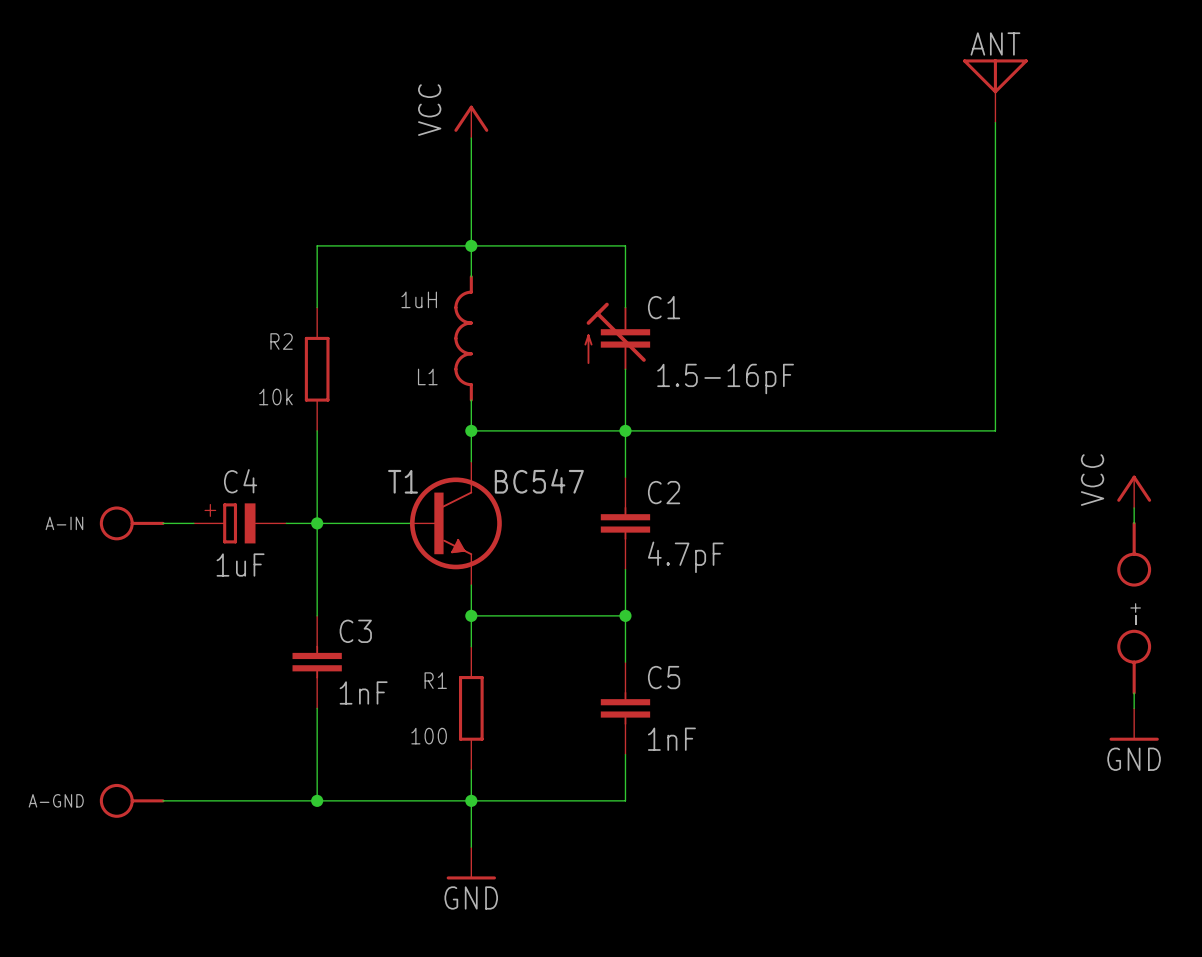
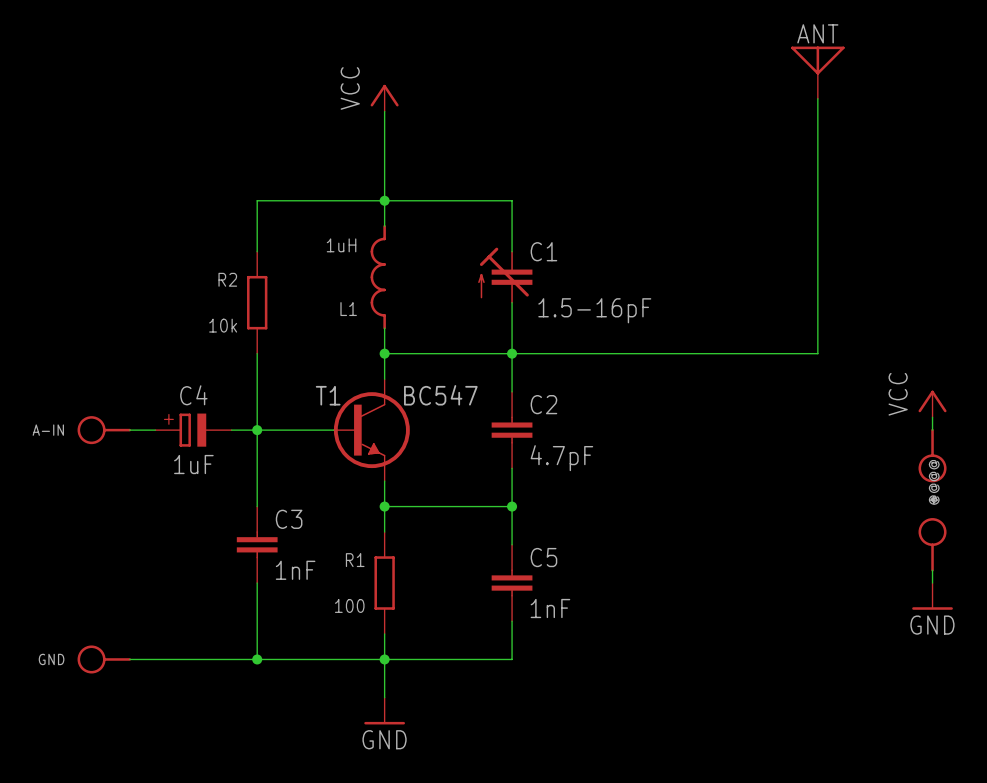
part name: ̶̶ (1135, 620) -> @@@@ (934, 482)
A-GND name: A-GND (56, 800) -> GND (51, 659)

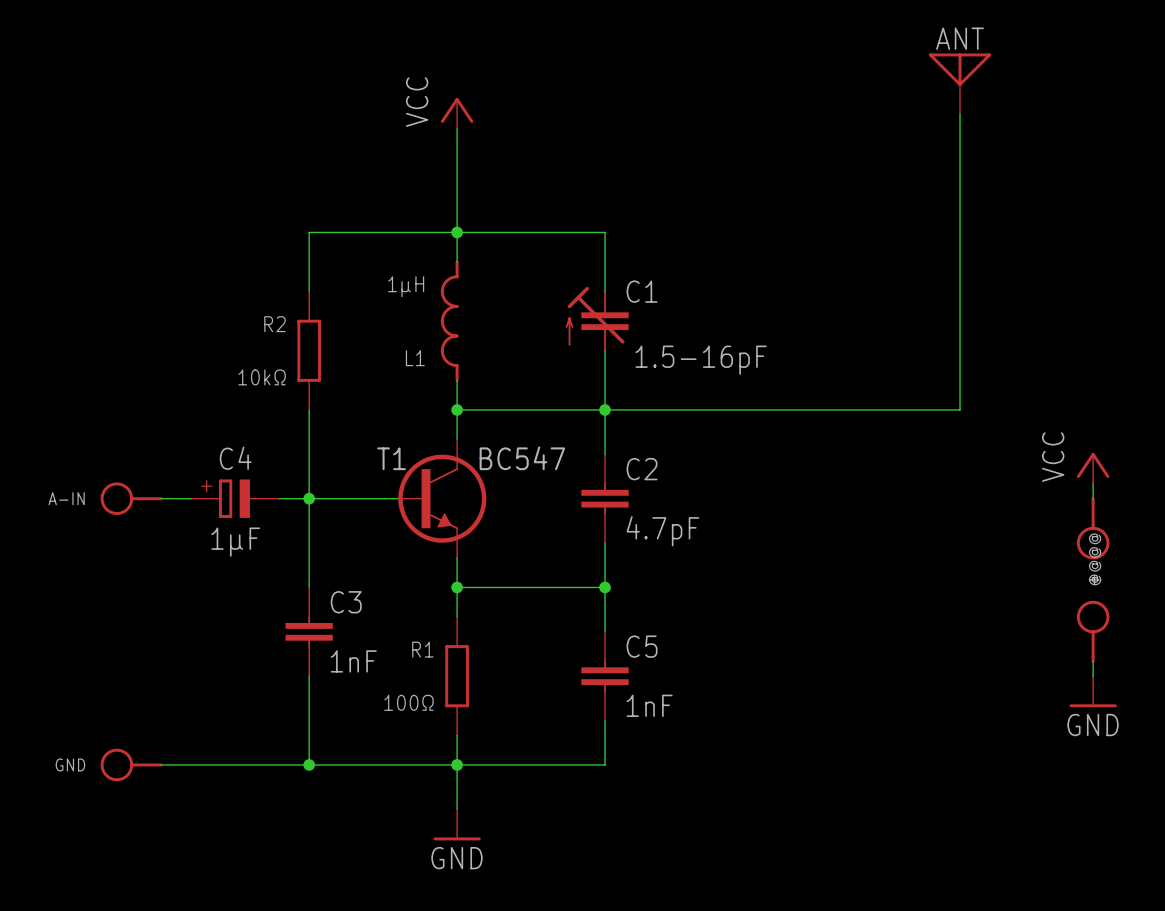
L1 value: 1uH (341, 245) -> 1μH (406, 286)
R2 value: 10k (223, 325) -> 10kΩ (262, 377)
C4 value: 1uF (193, 464) -> 1μF (235, 542)
R1 value: 100 (349, 605) -> 100Ω (408, 702)

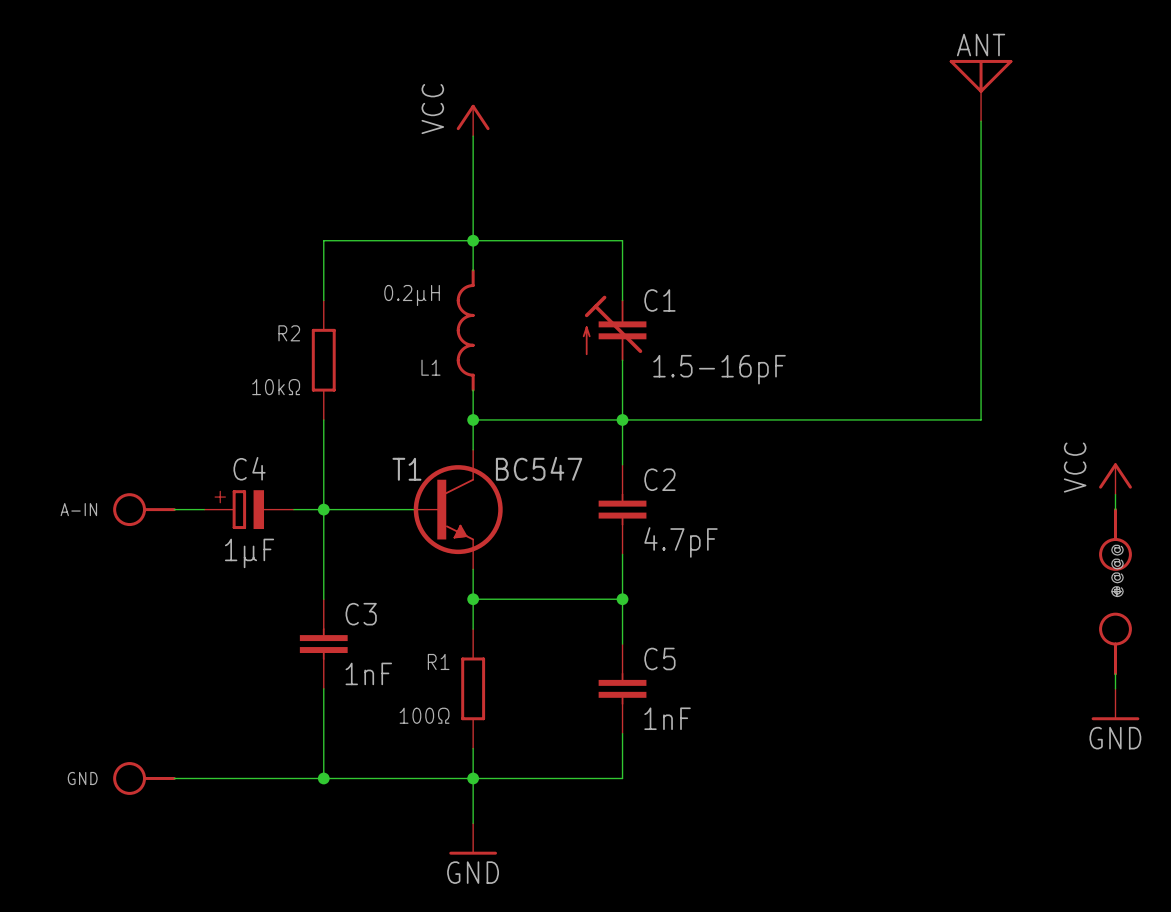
L1 value: 1μH (406, 286) -> 0.2μH (412, 295)

